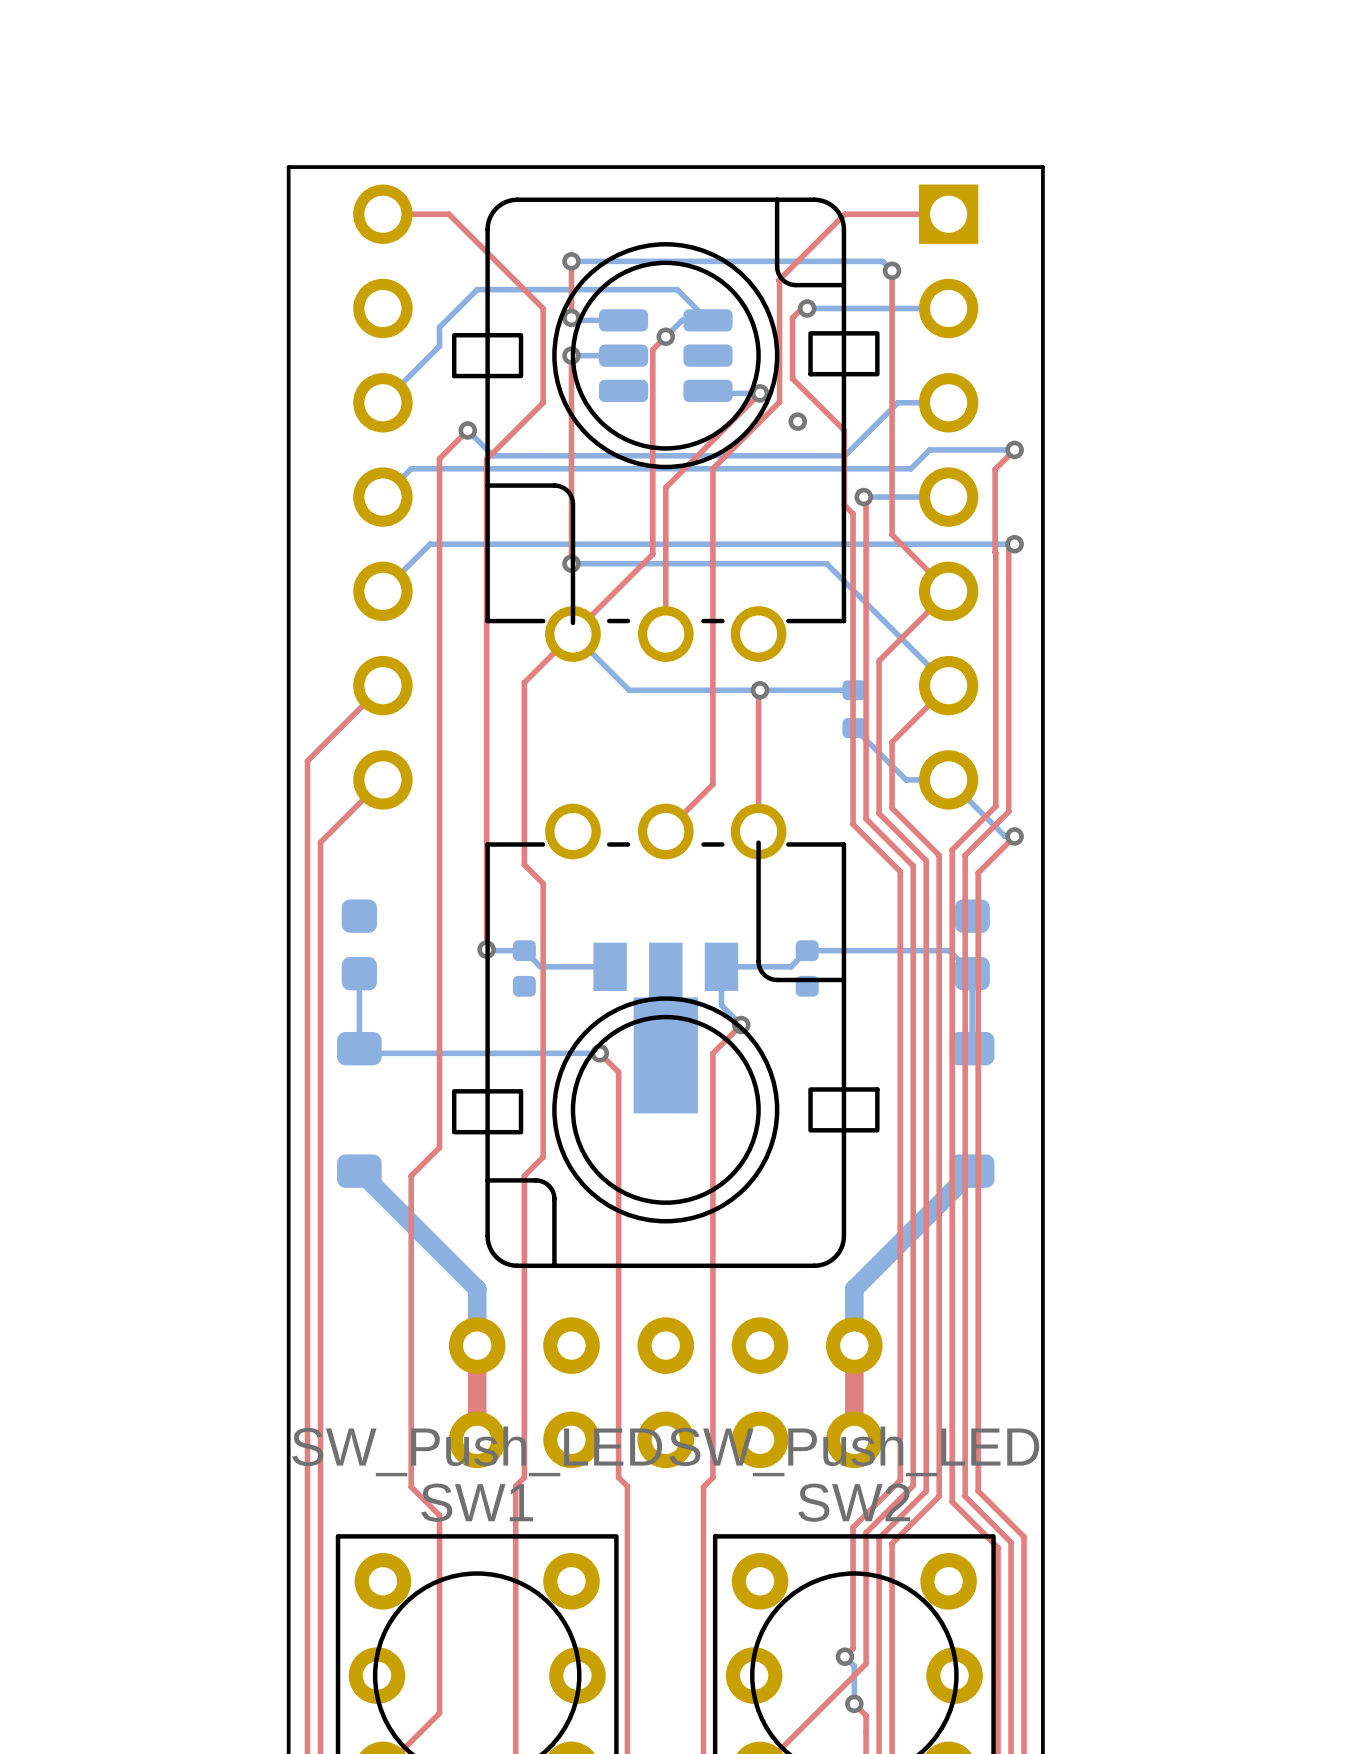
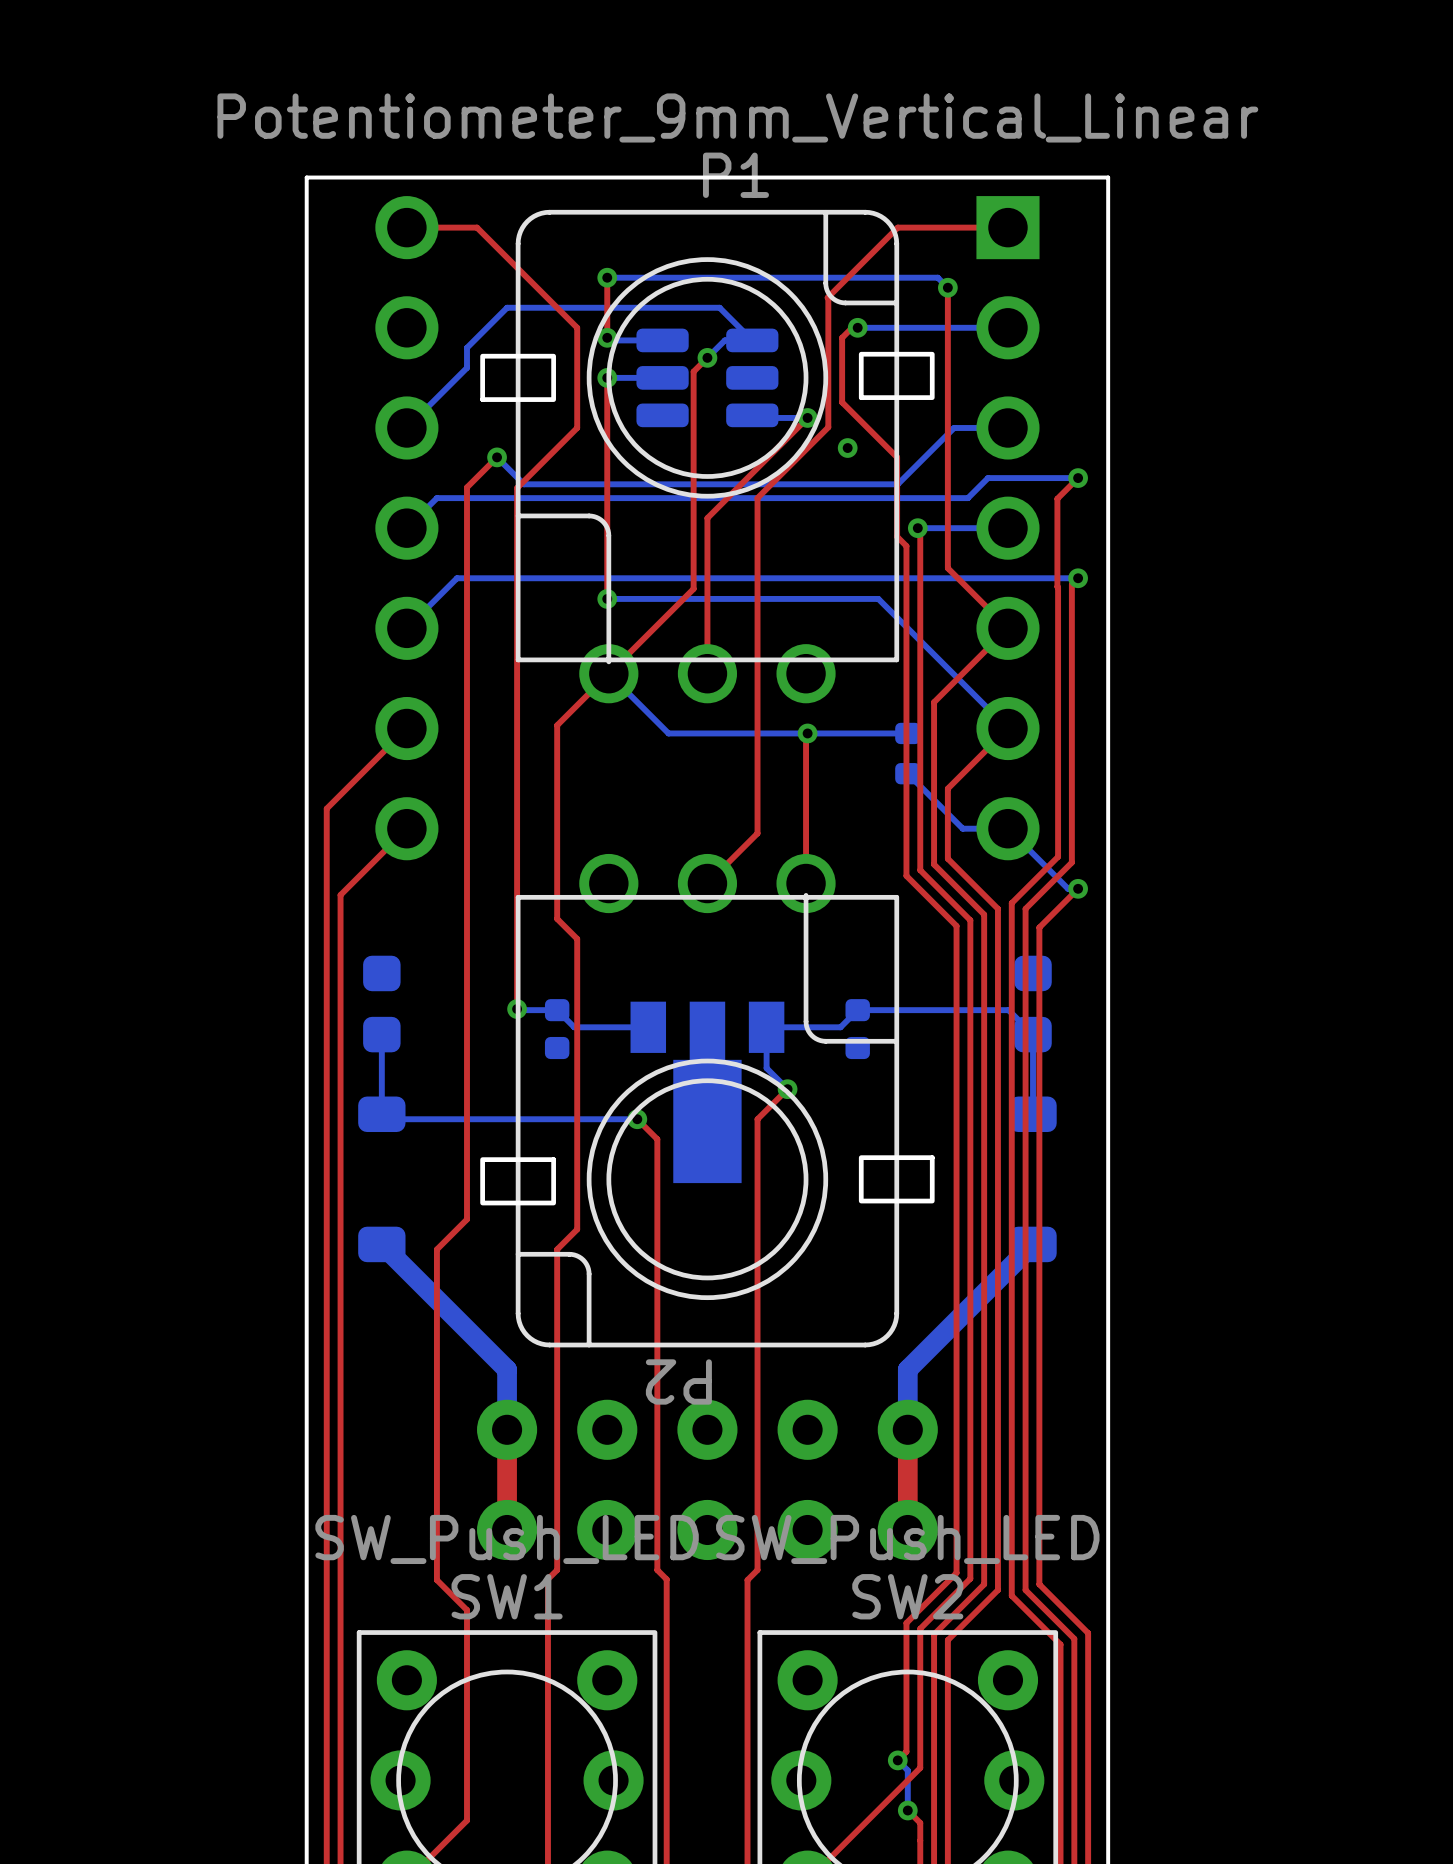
part: (665, 429) -> none
P1: none -> Potentiometer_9mm_Vertical_Linear (707, 456)
part: (665, 1035) -> none
P2: none -> (707, 1100)

